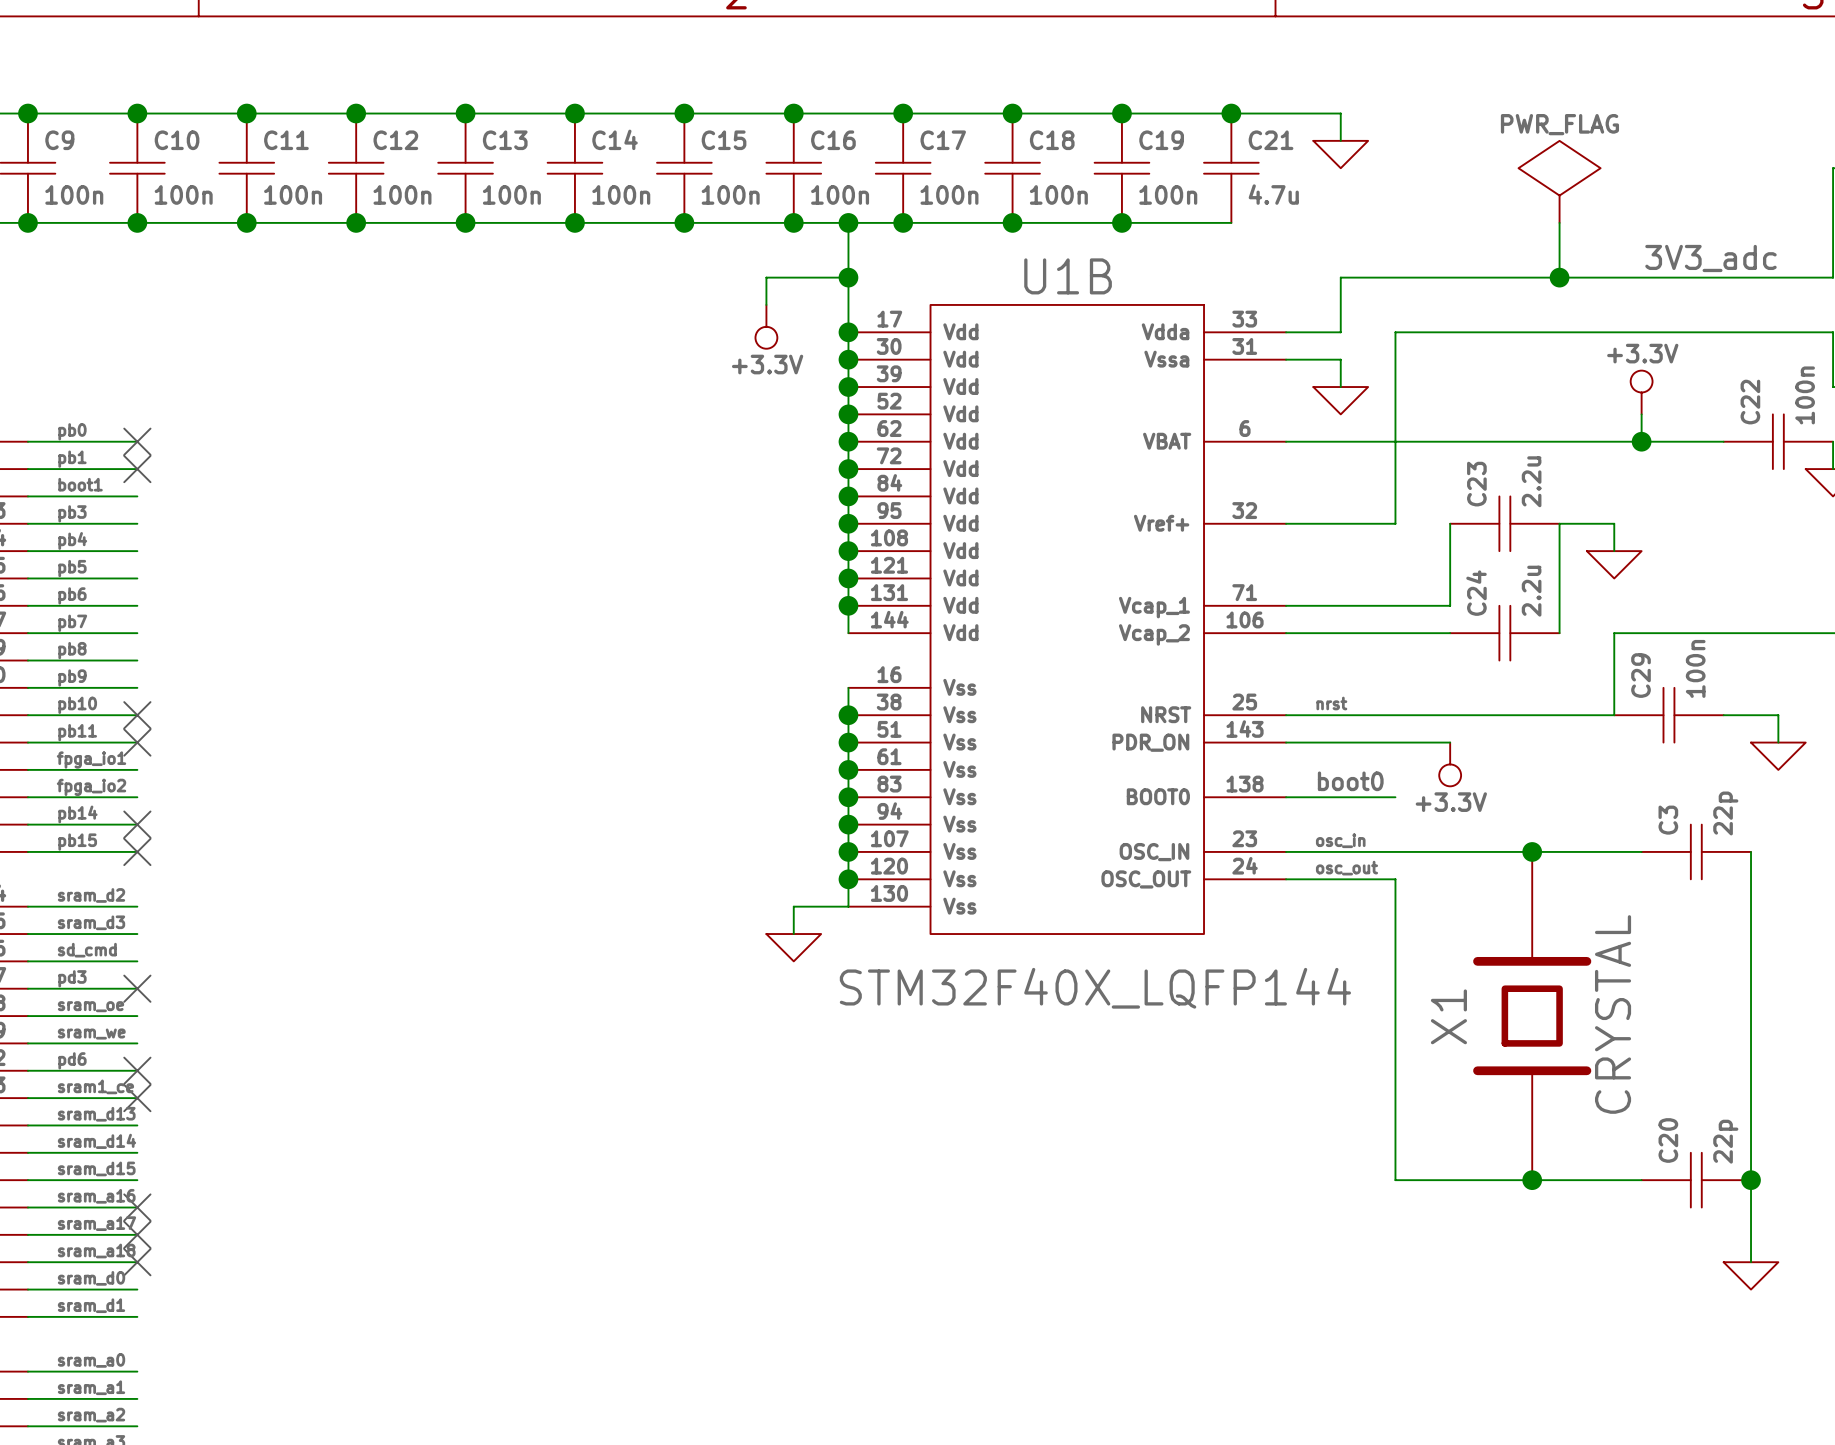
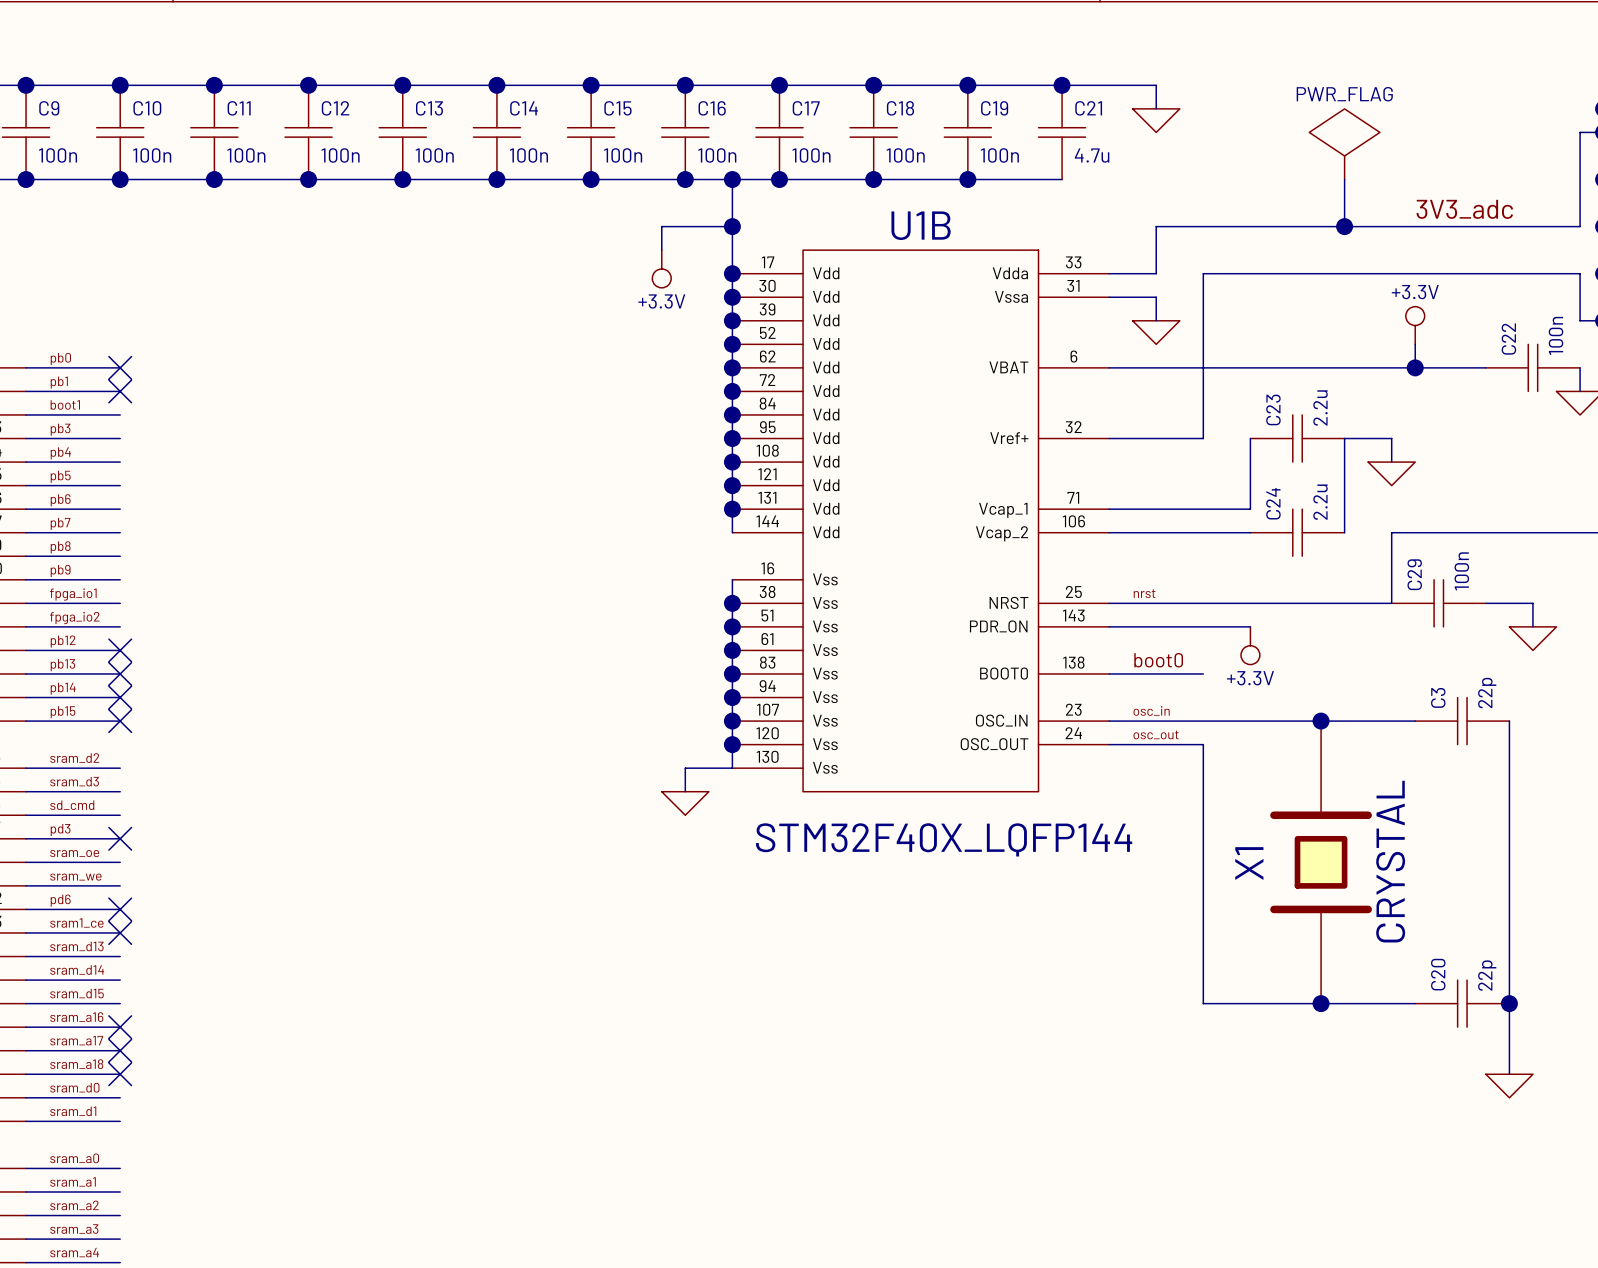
label: pb10 (77, 705) -> fpga_io1 (73, 594)
no-connect mark: (137, 715) -> none
label: pb11 (77, 732) -> fpga_io2 (74, 618)
no-connect mark: (137, 742) -> none
label: fpga_io1 (91, 760) -> pb12 (63, 641)
no-connect mark: none -> (120, 650)
label: fpga_io2 (91, 787) -> pb13 (62, 665)
no-connect mark: none -> (120, 673)

